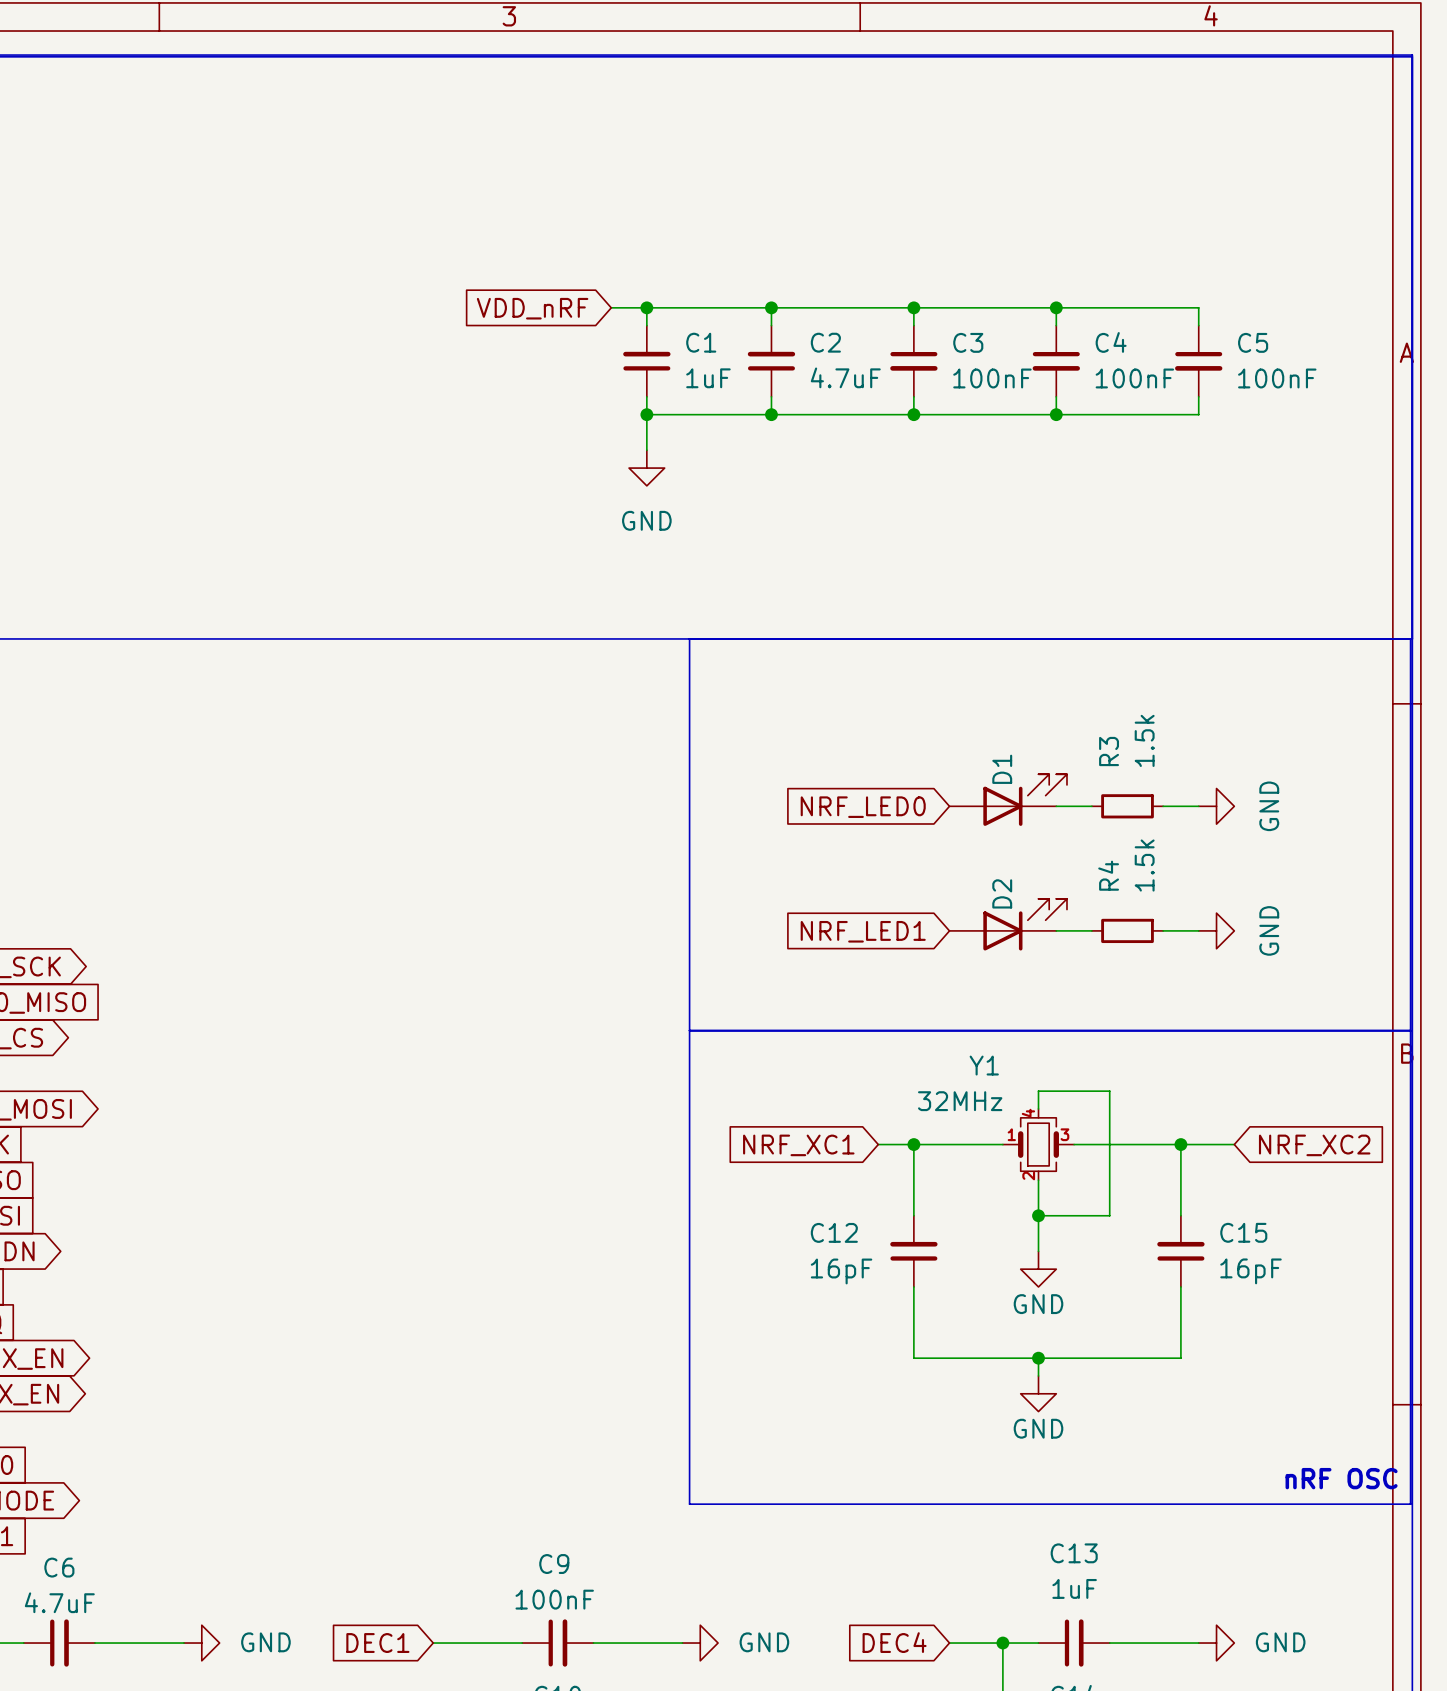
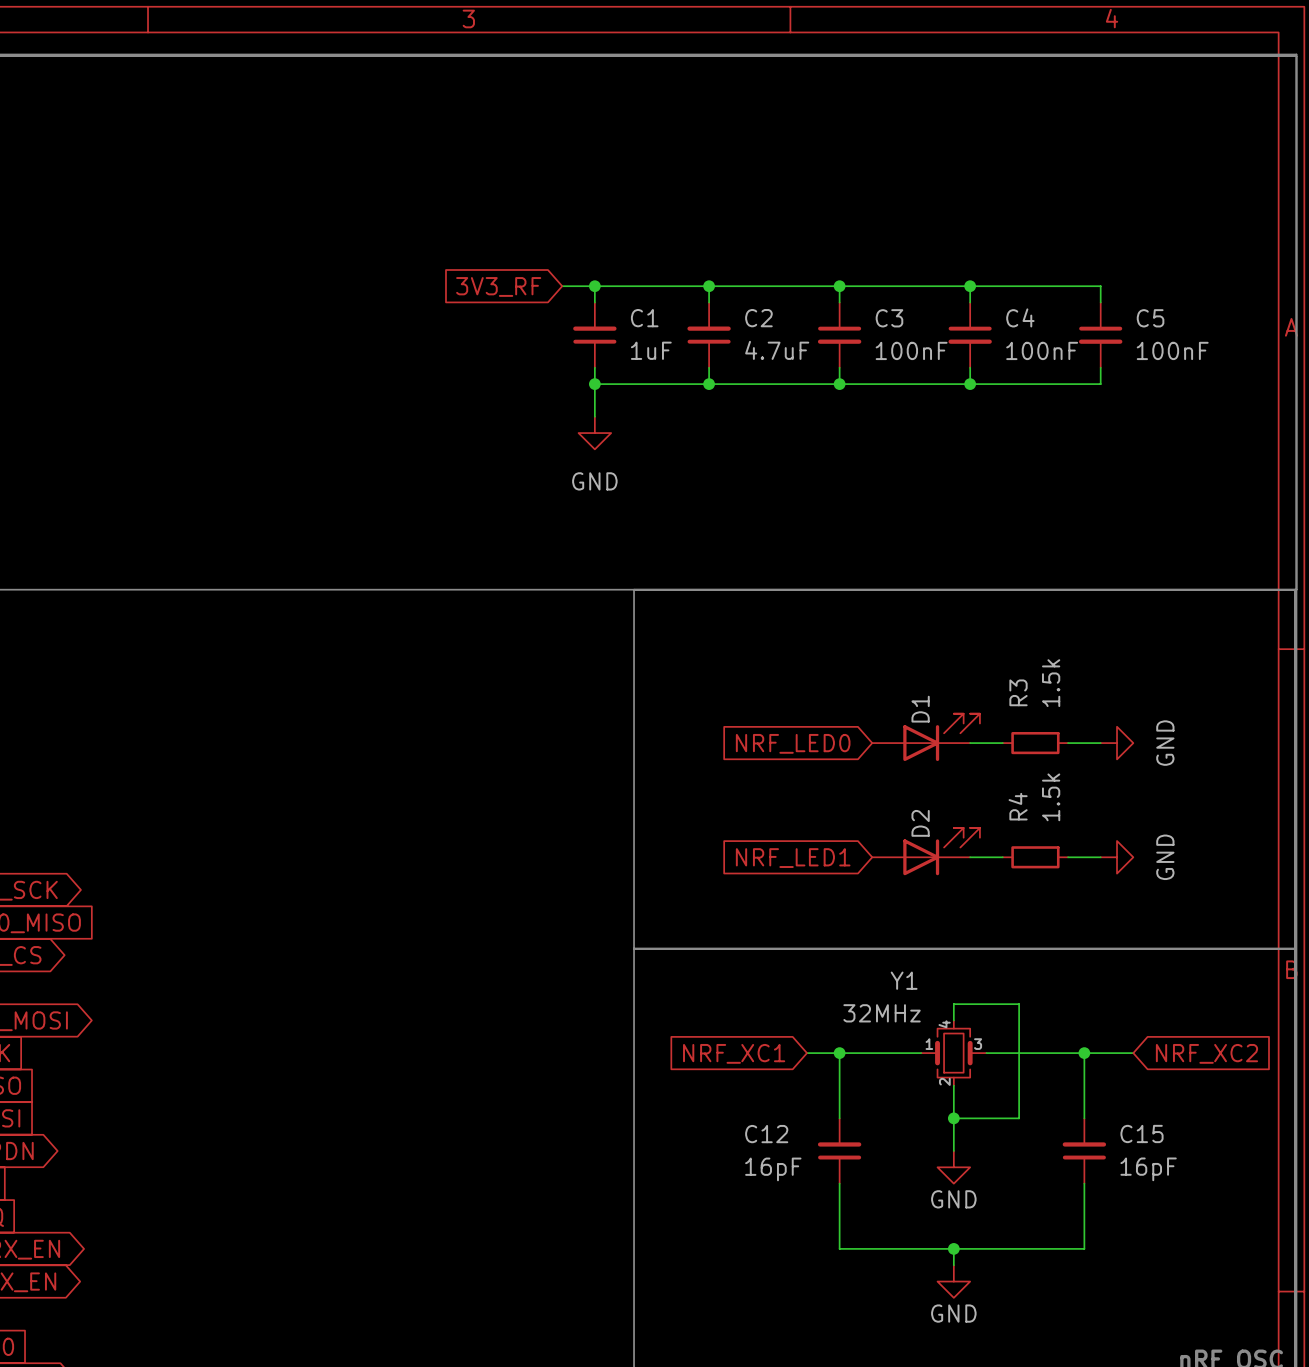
global label: VDD_nRF (532, 308) -> 3V3_RF (498, 286)

